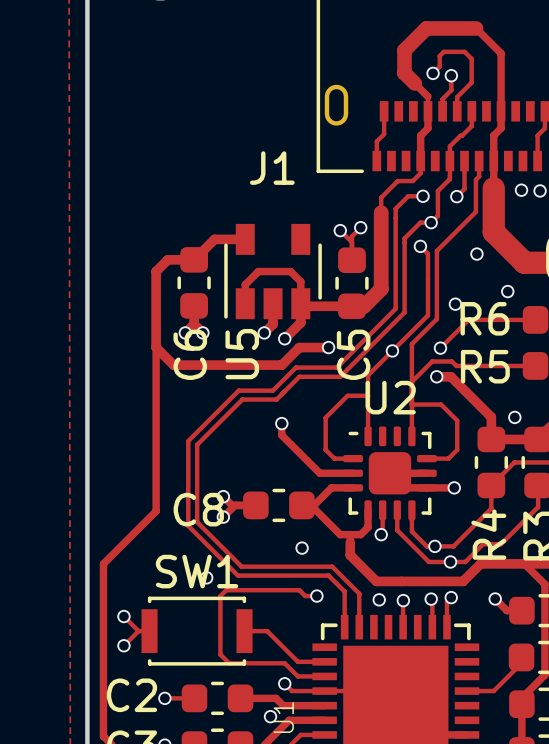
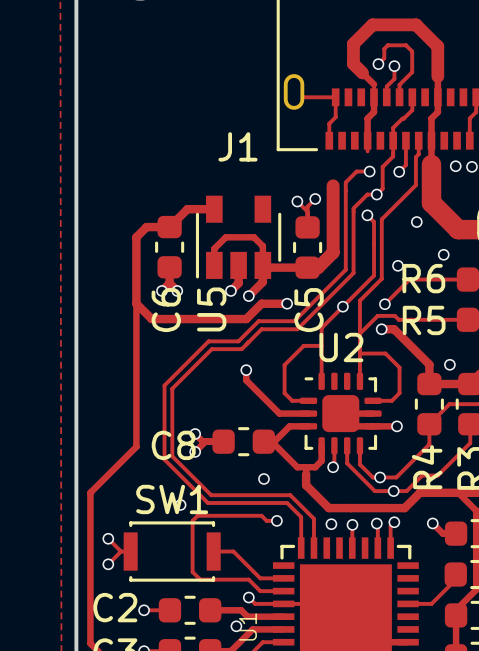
track width: thin (476, 28) (501, 53) (501, 87) -> thick (416, 24) (437, 46) (437, 76)
track: none -> (294, 91) (299, 97) (335, 97)
track: (420, 173) (412, 181) (397, 181) (381, 197) (381, 212) -> none

